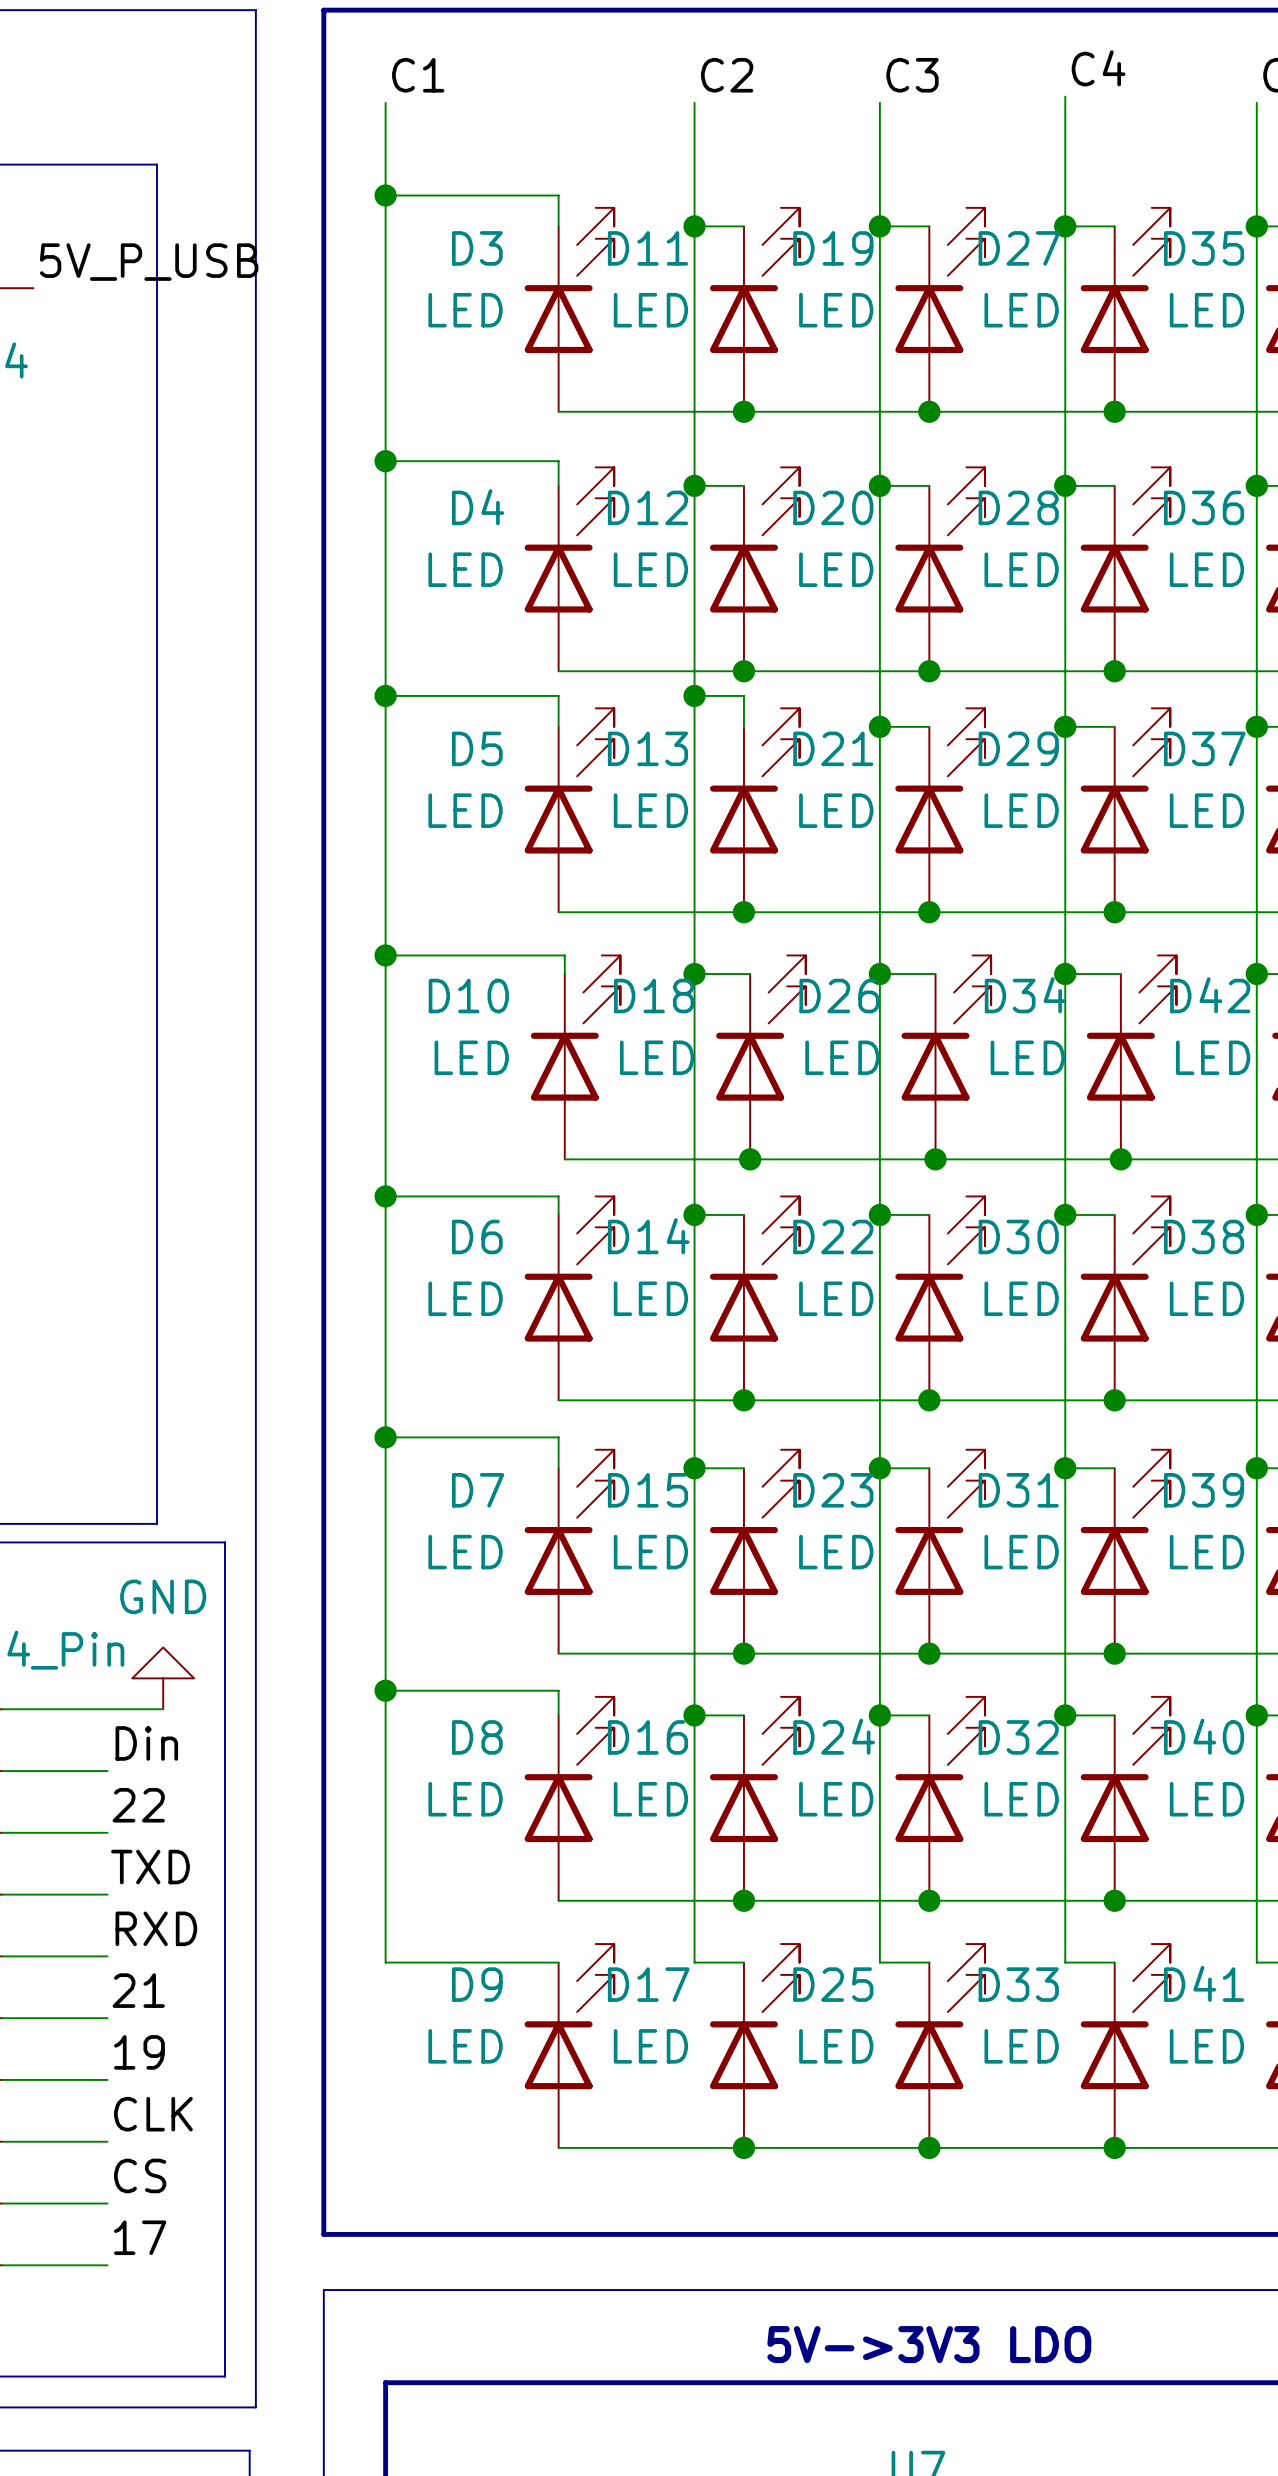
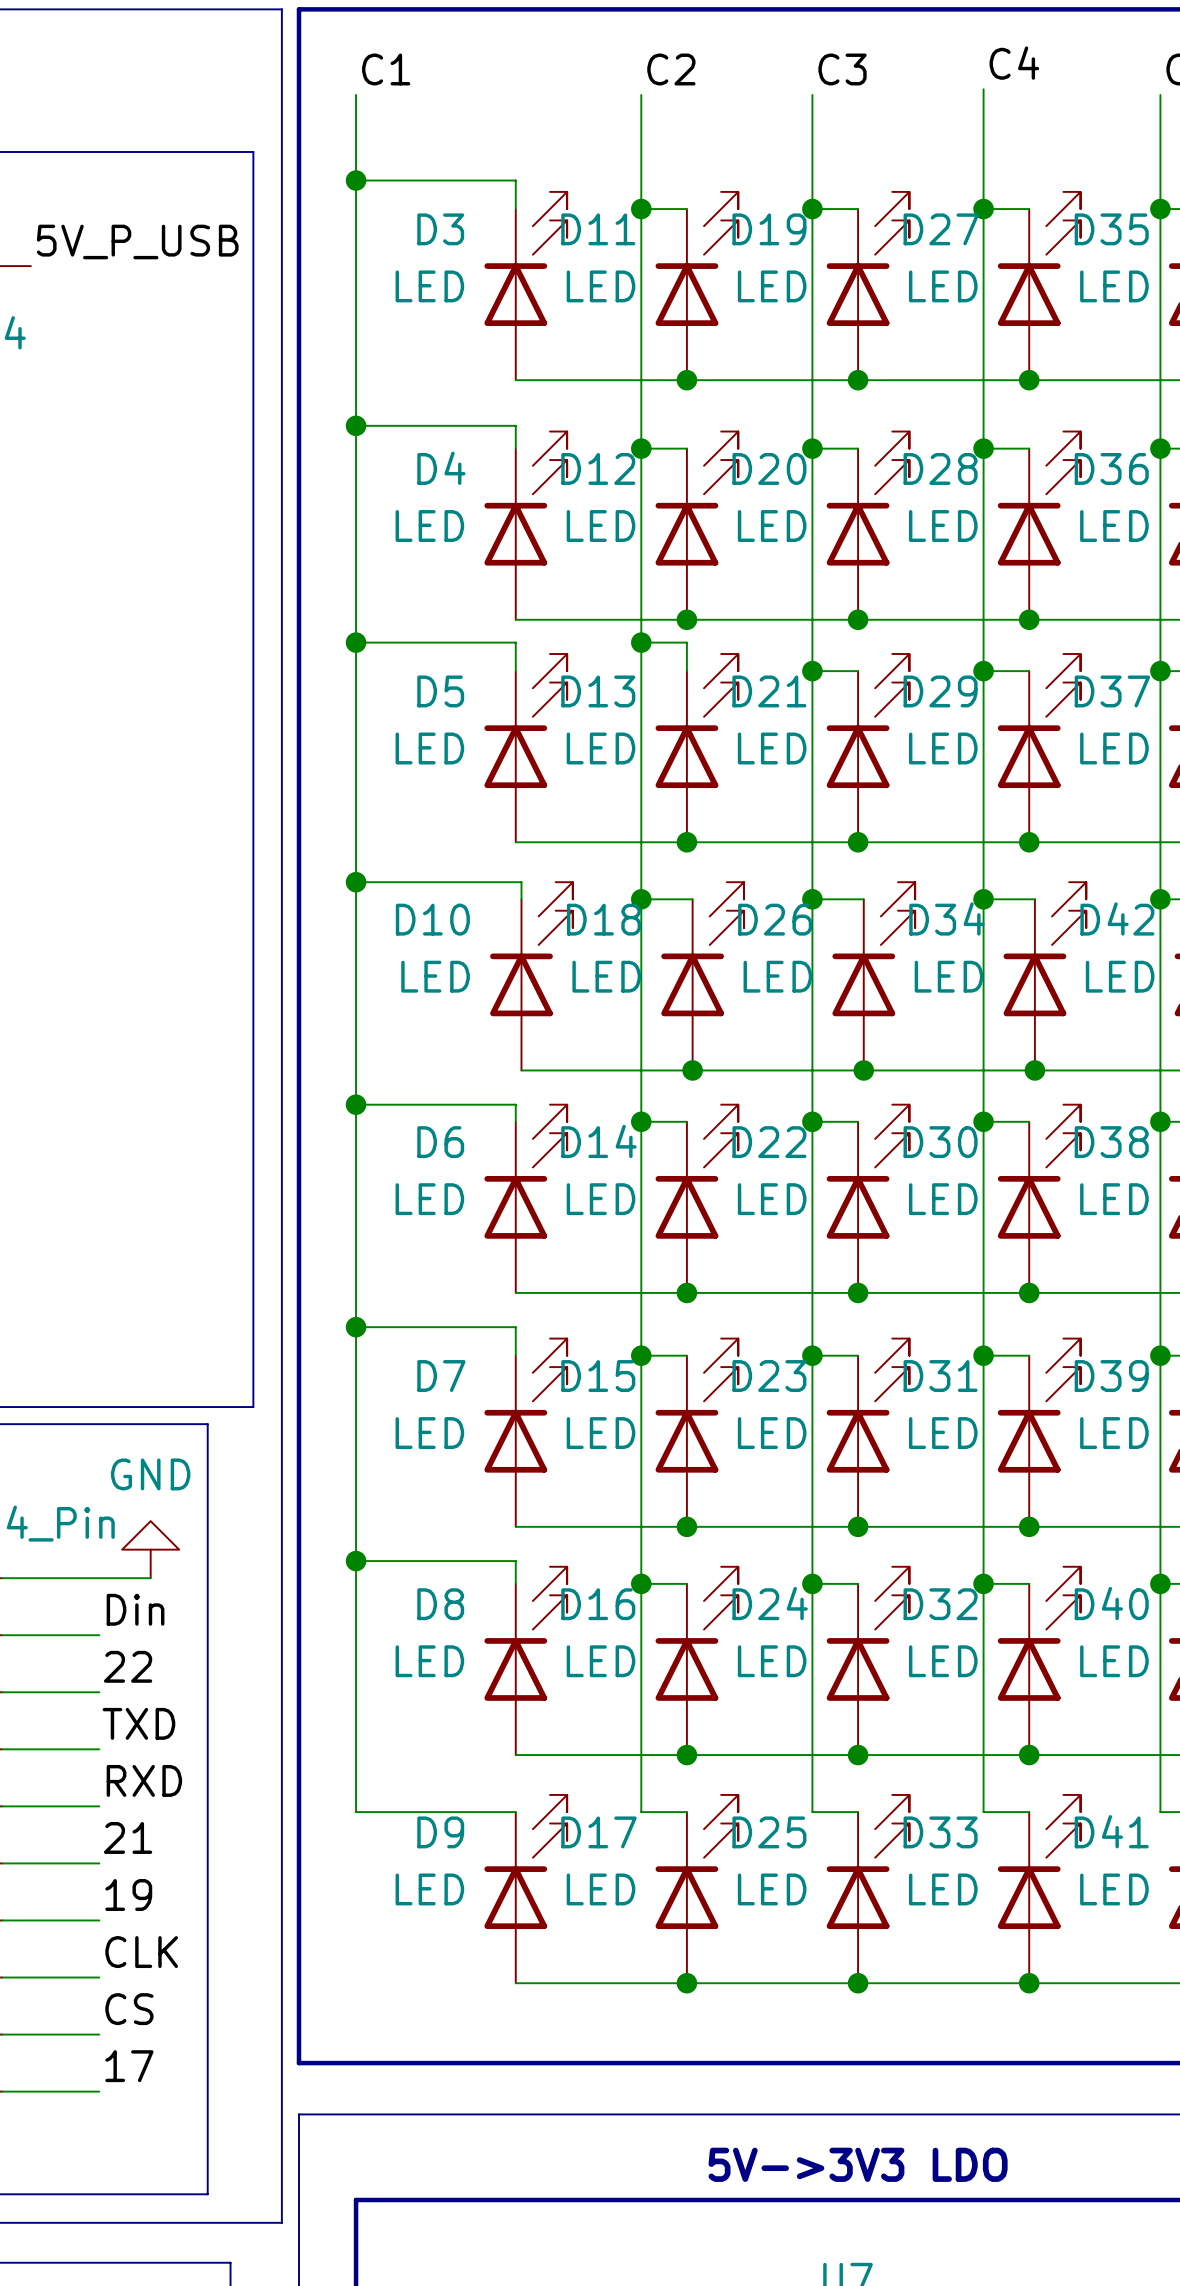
line: (255, 10) (255, 2407) -> (236, 9) (281, 9) (281, 2222) (236, 2222)
line: (157, 164) (157, 1523) -> (144, 151) (253, 151) (253, 1407) (144, 1407)

